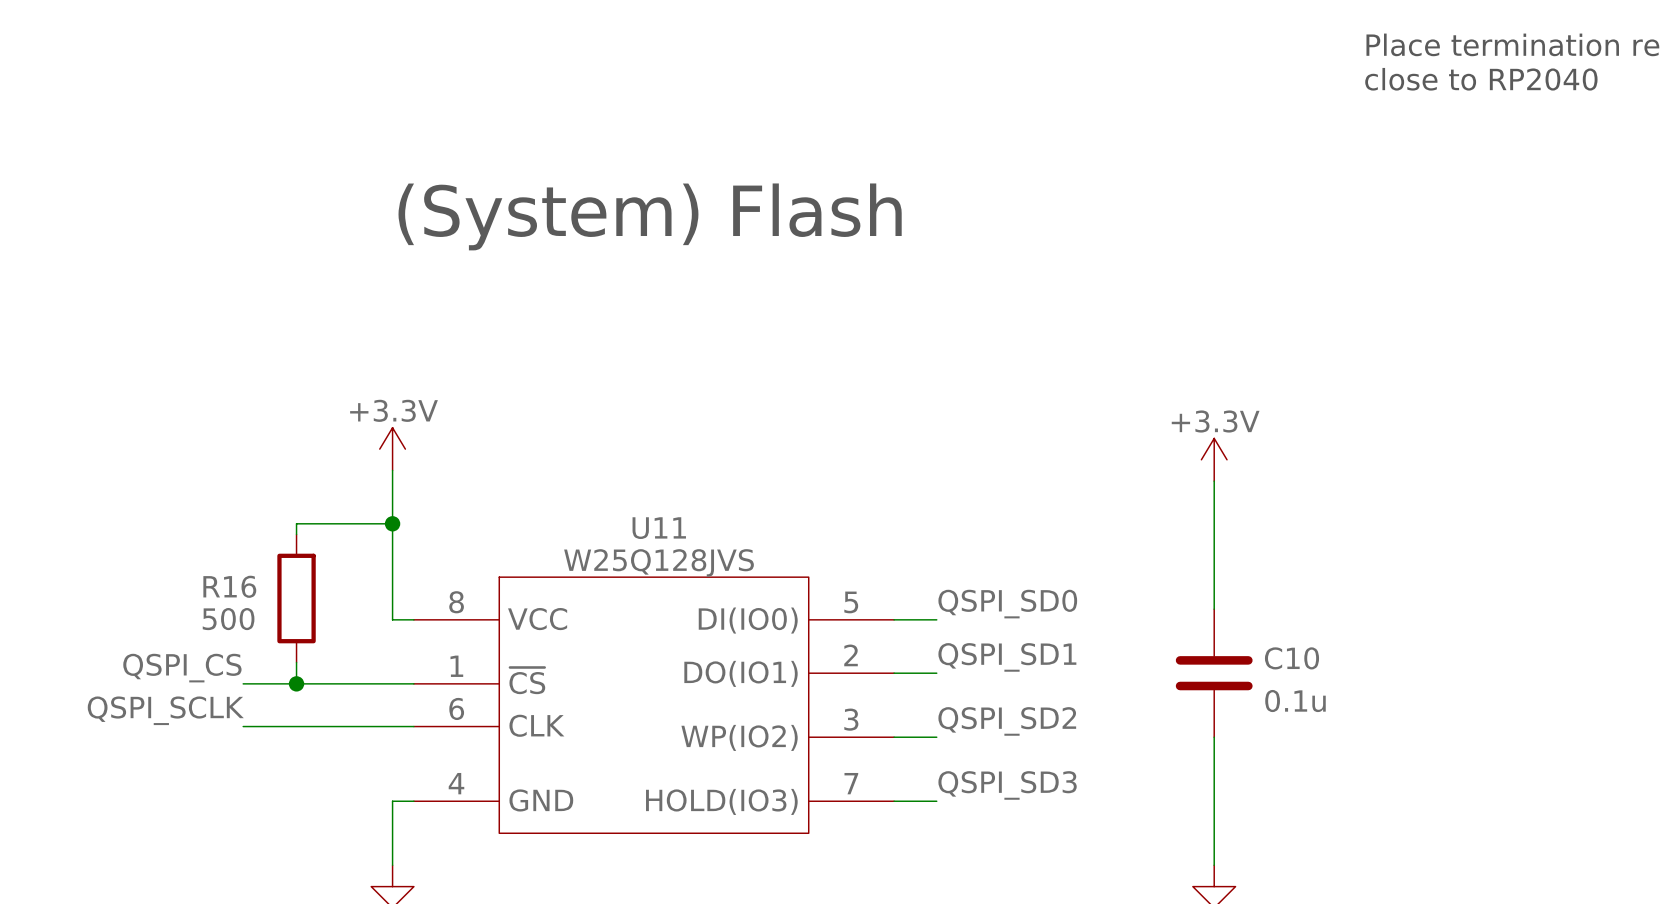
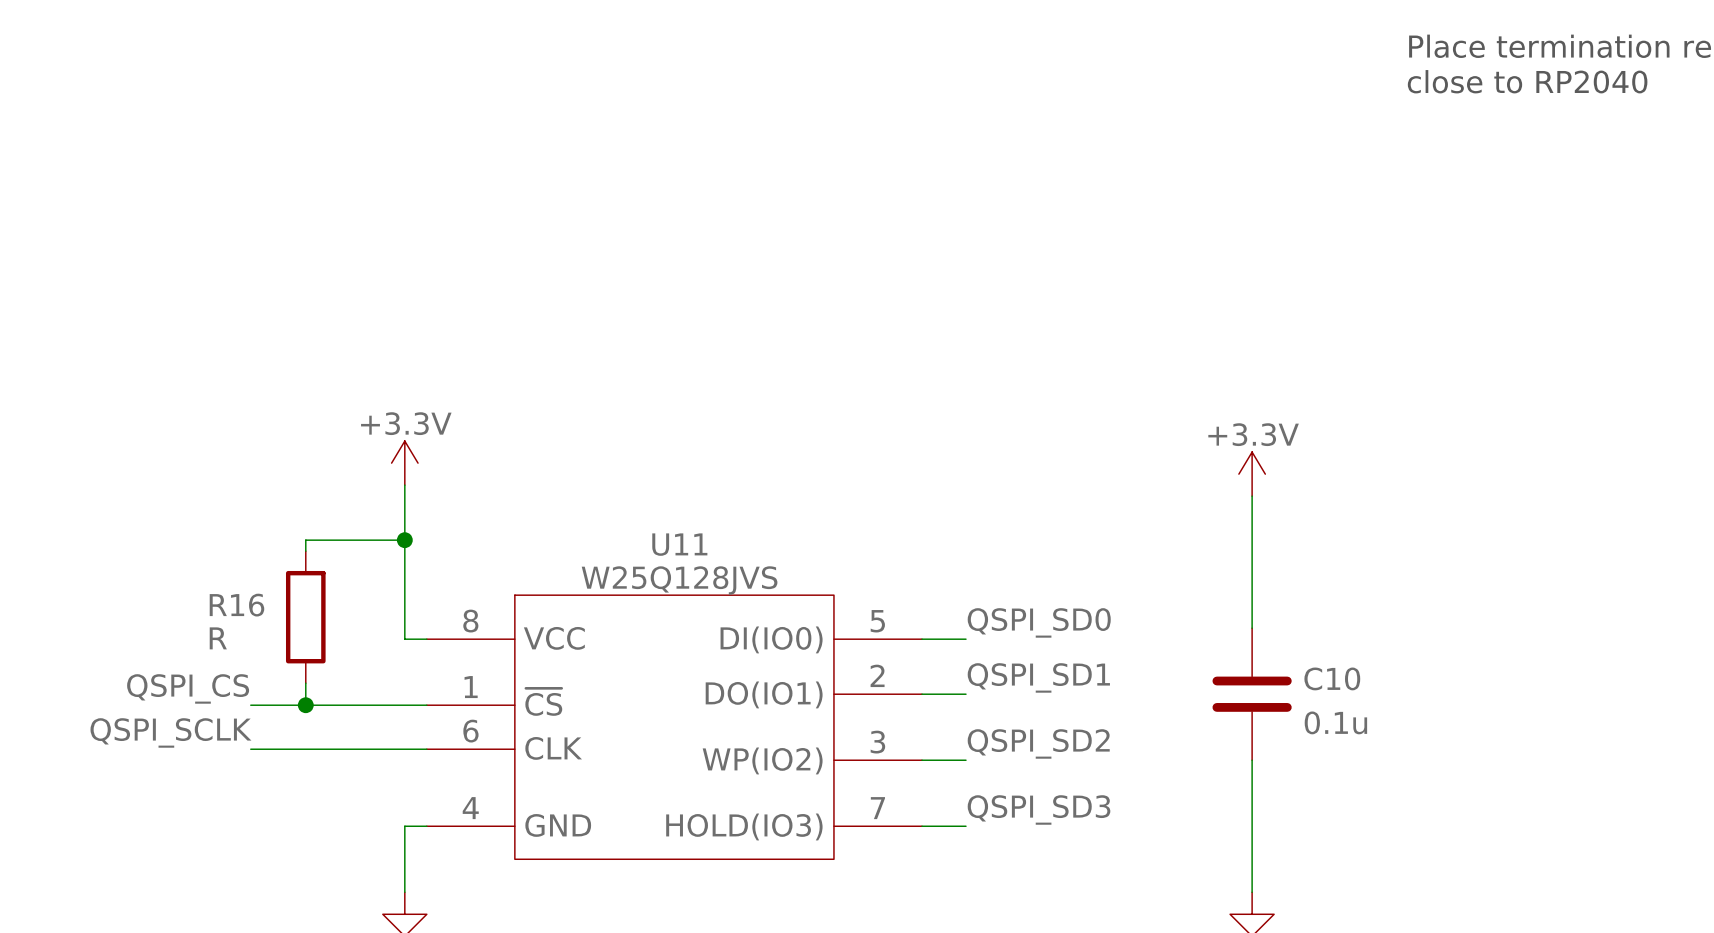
text: (System) Flash (650, 216) -> none
R16 value: 500 (228, 619) -> R (218, 638)

